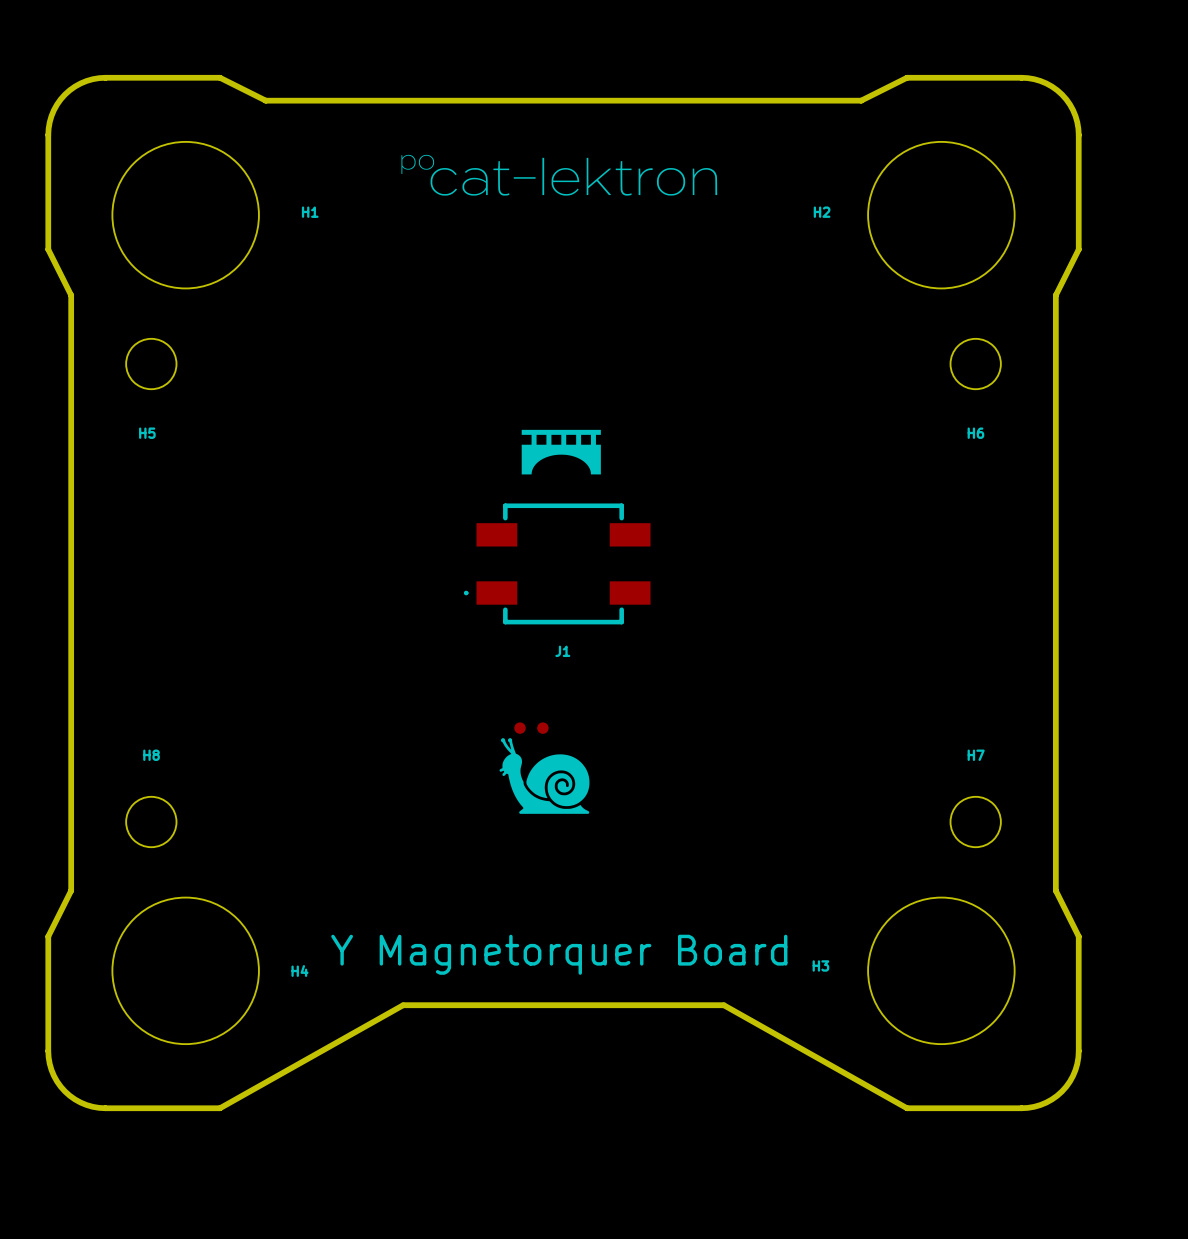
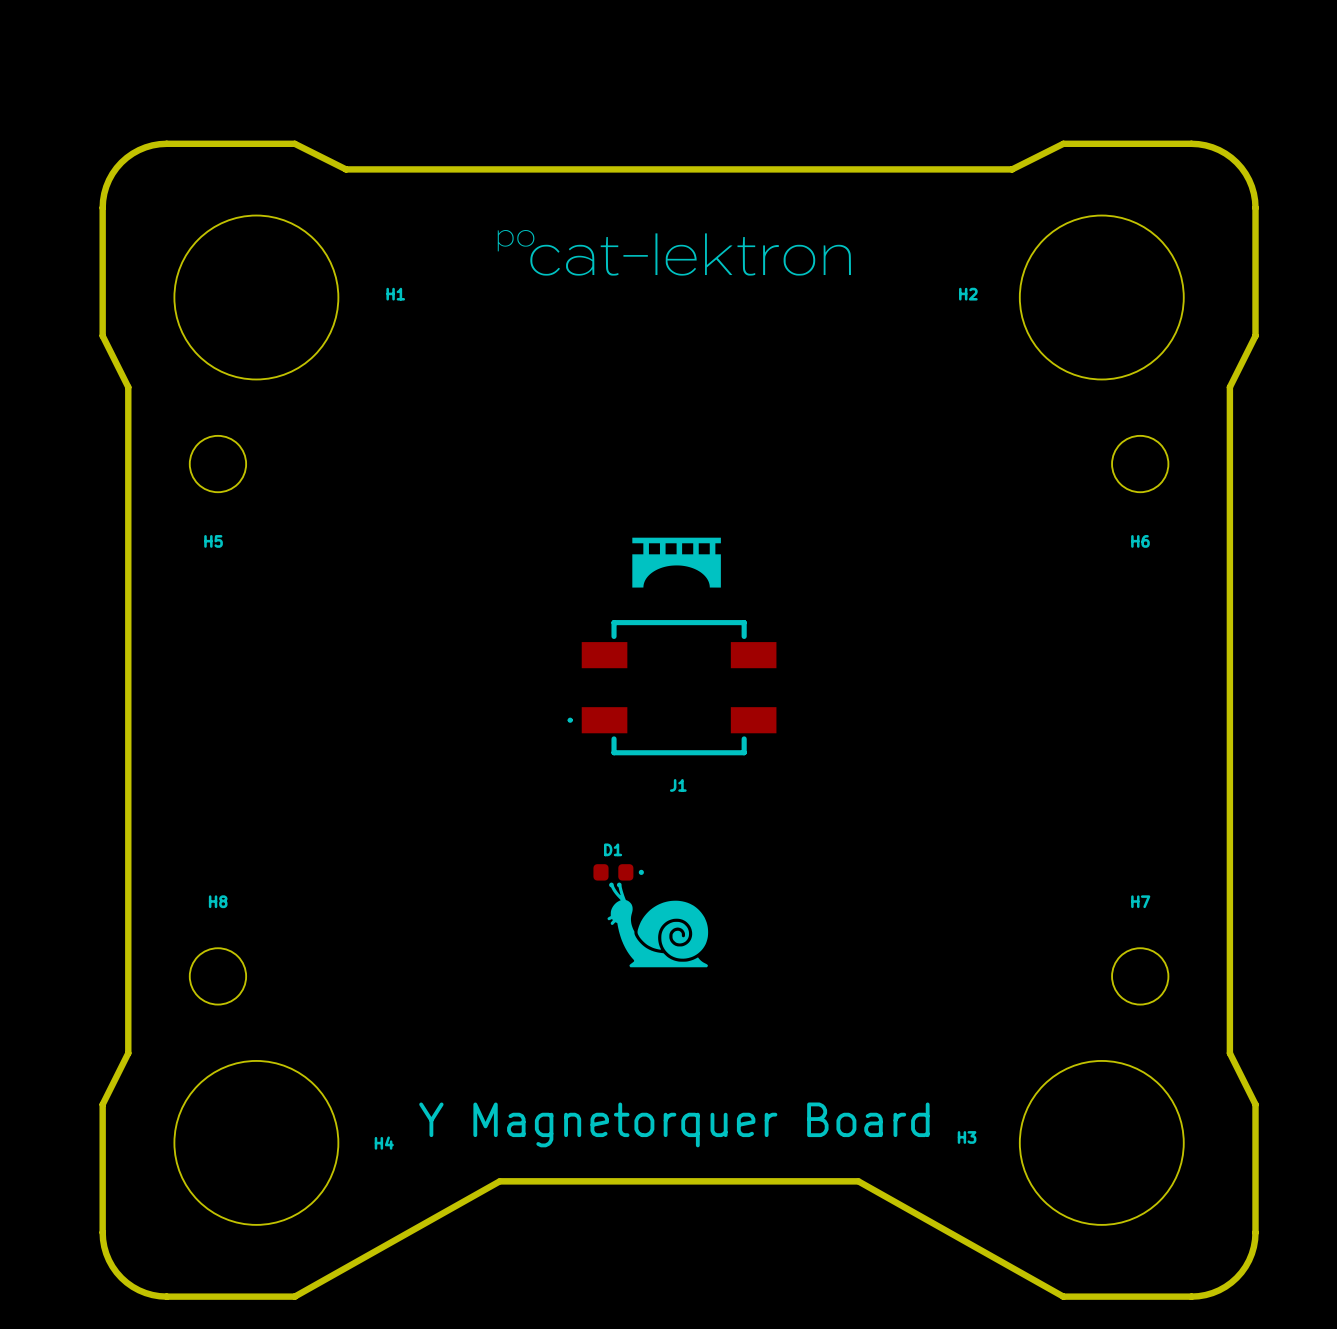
part: (531, 728) -> none
D1: none -> (618, 872)

